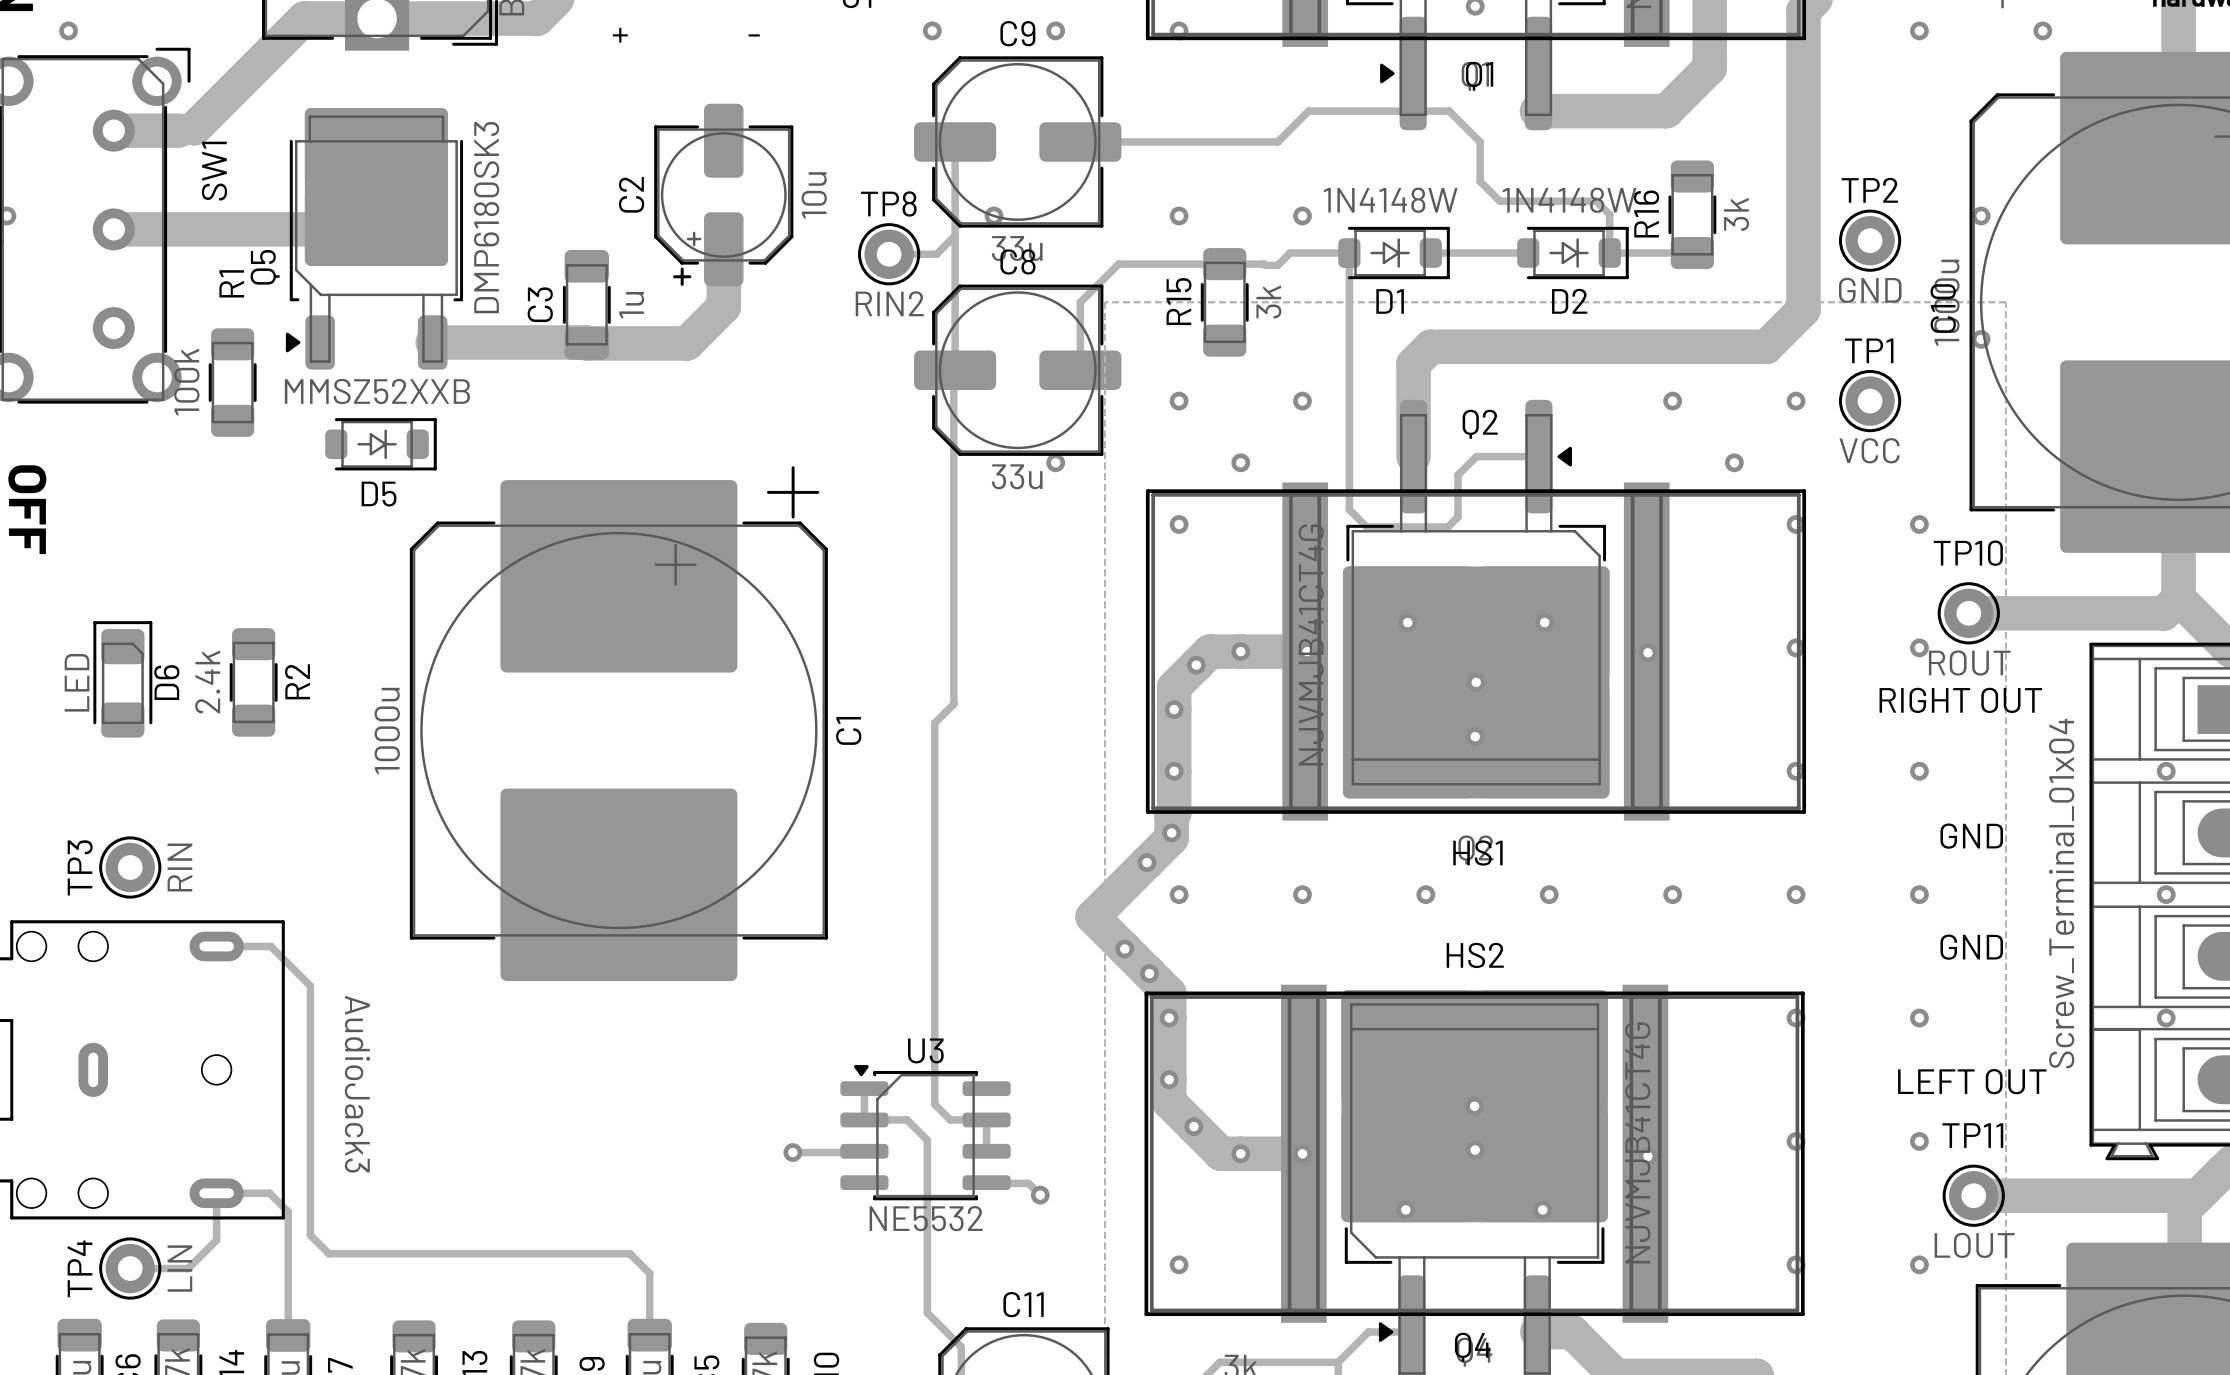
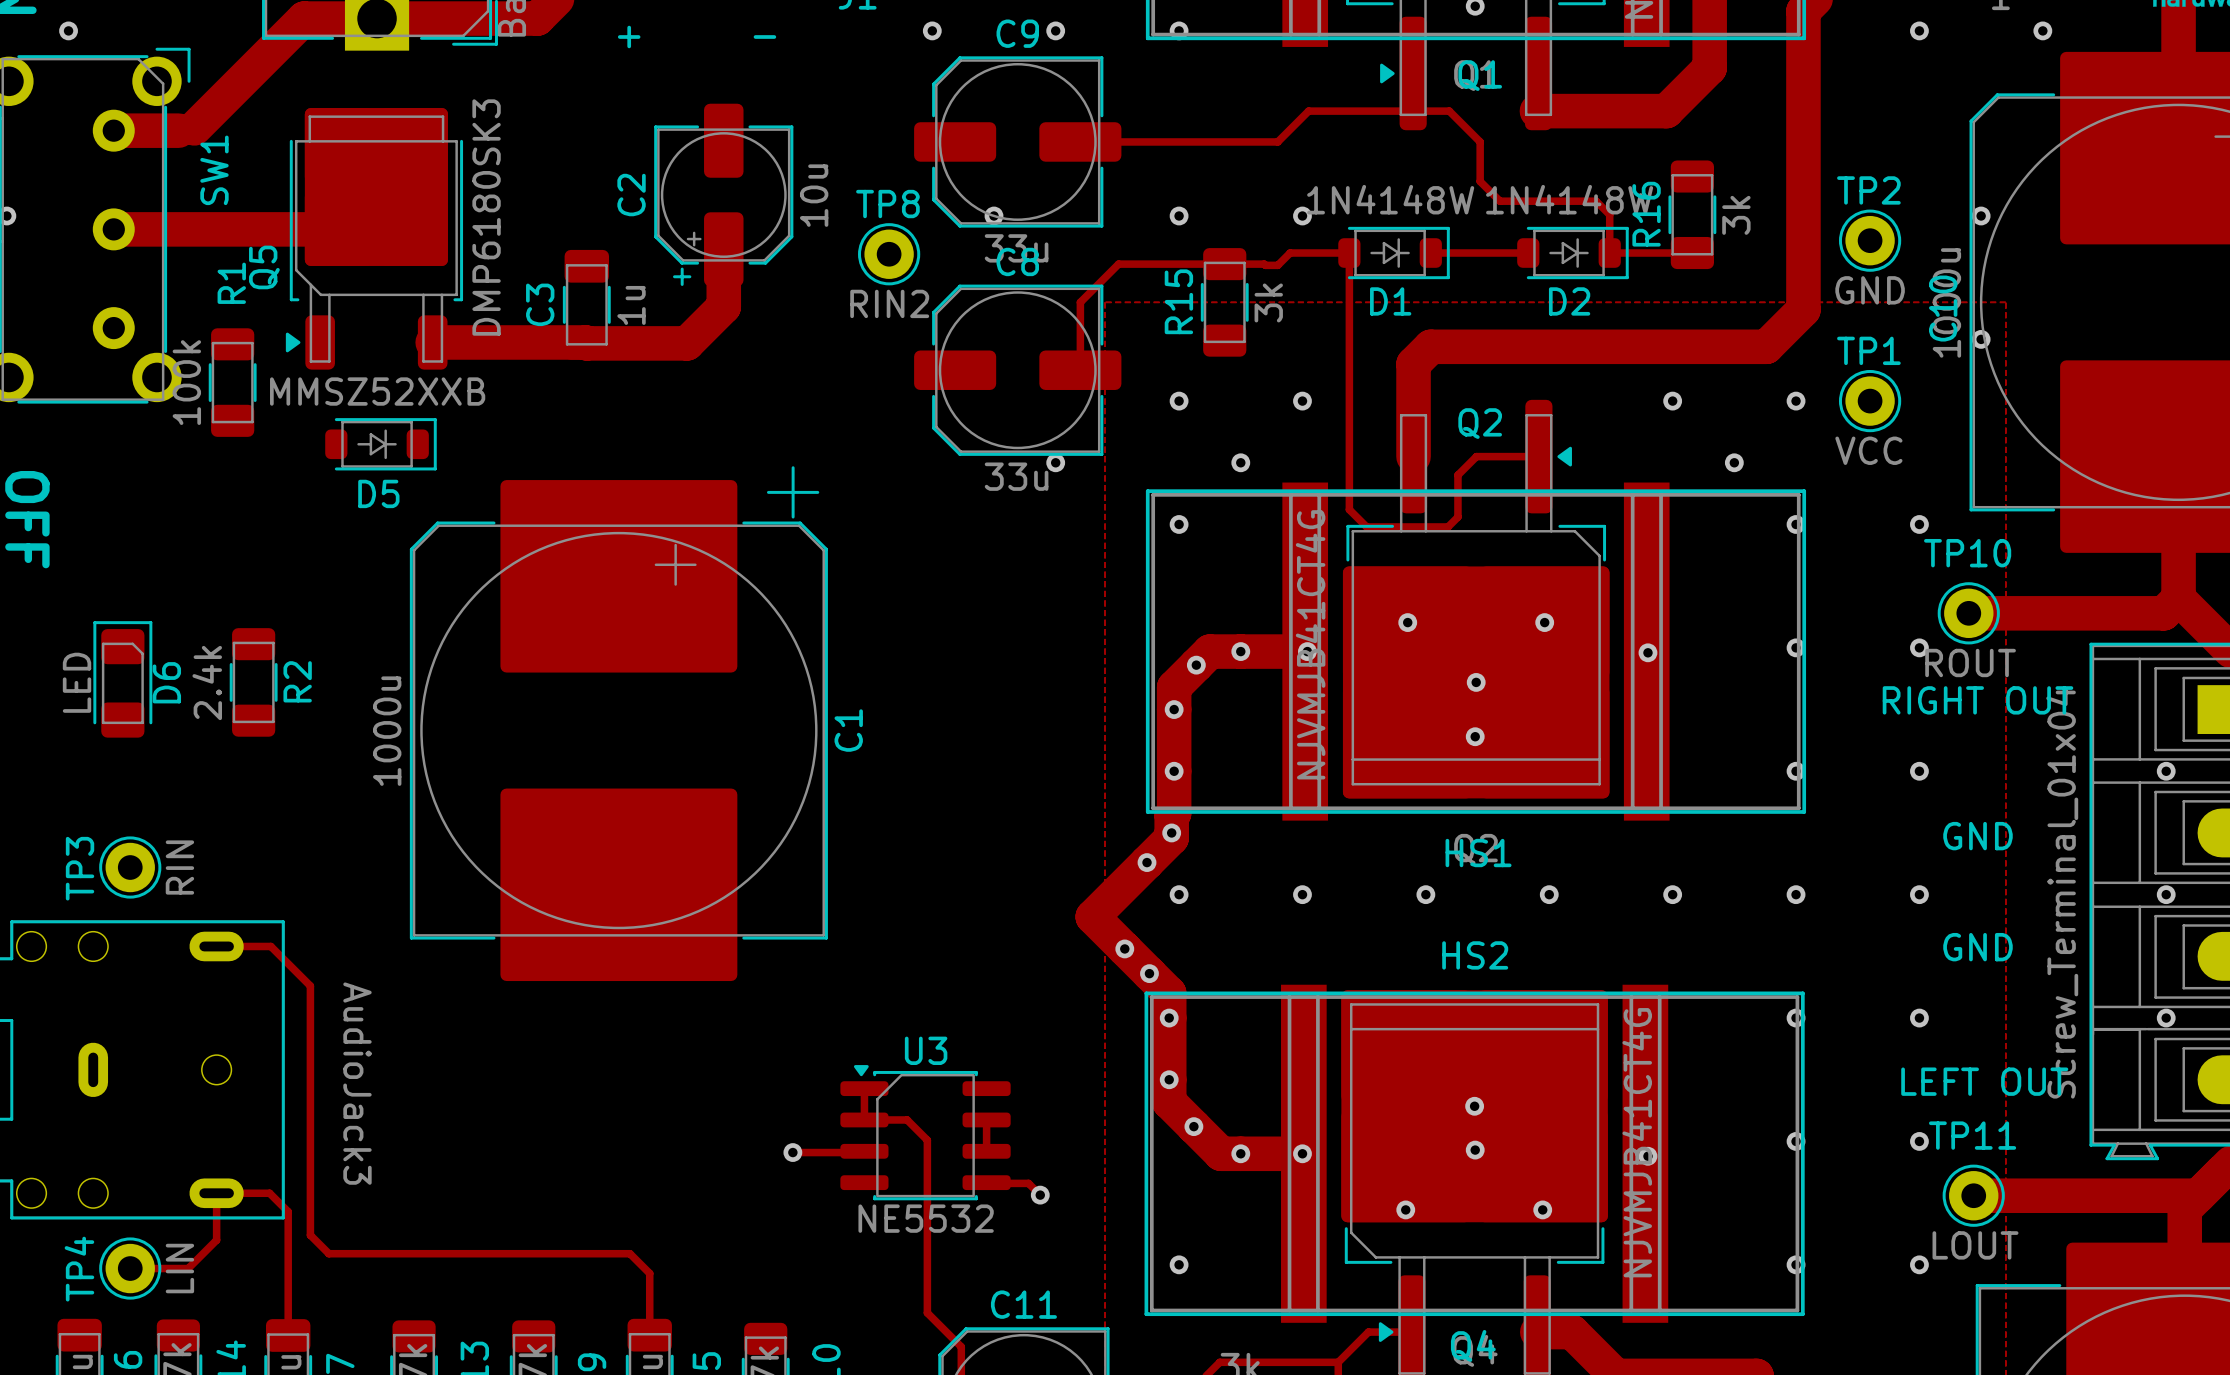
track: (955, 141) (953, 704) (934, 723) (934, 1104) (950, 1119) (986, 1119) -> none
track: (955, 235) (936, 254) (889, 254) -> none

